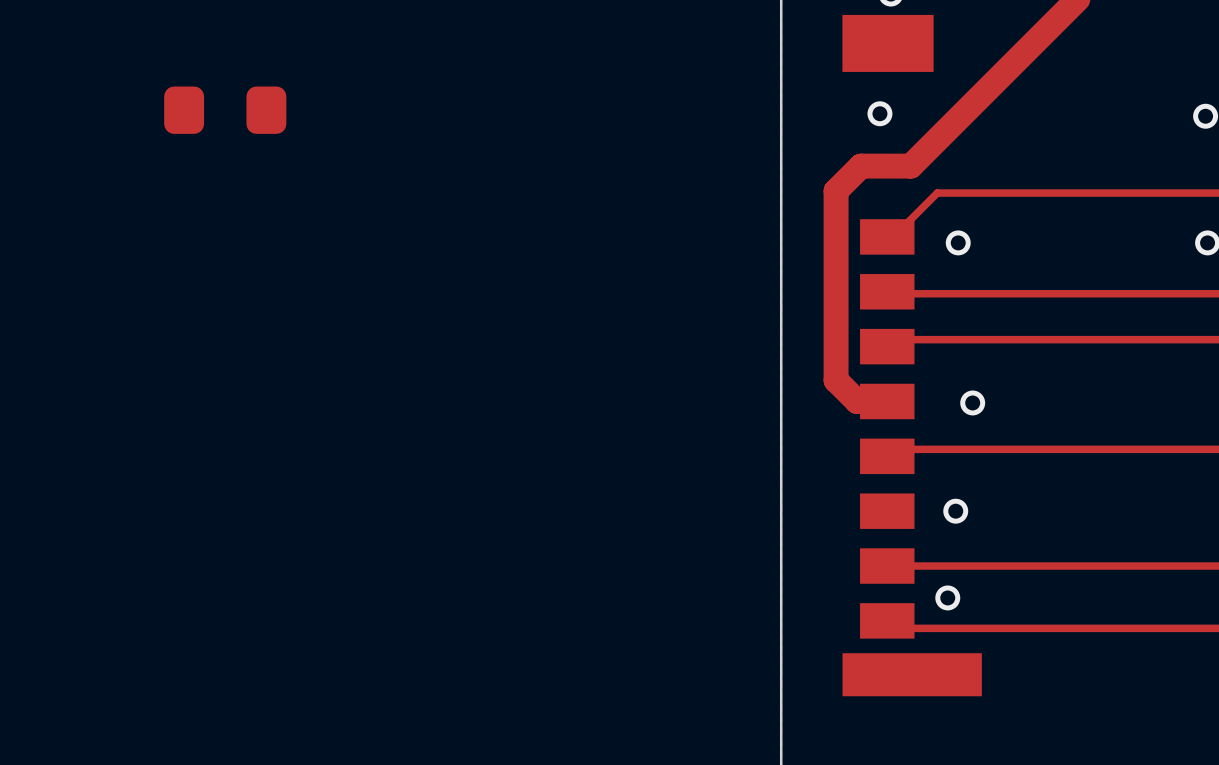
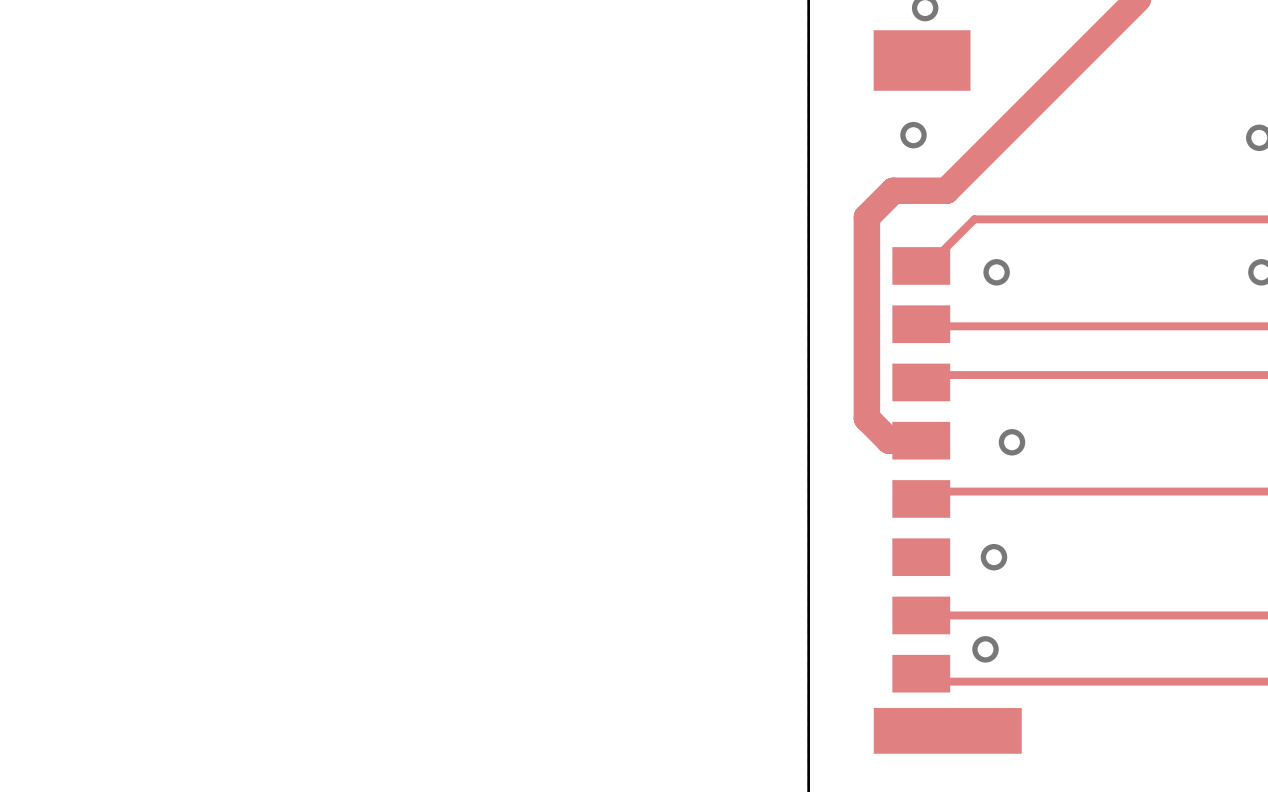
part: (225, 110) -> none

